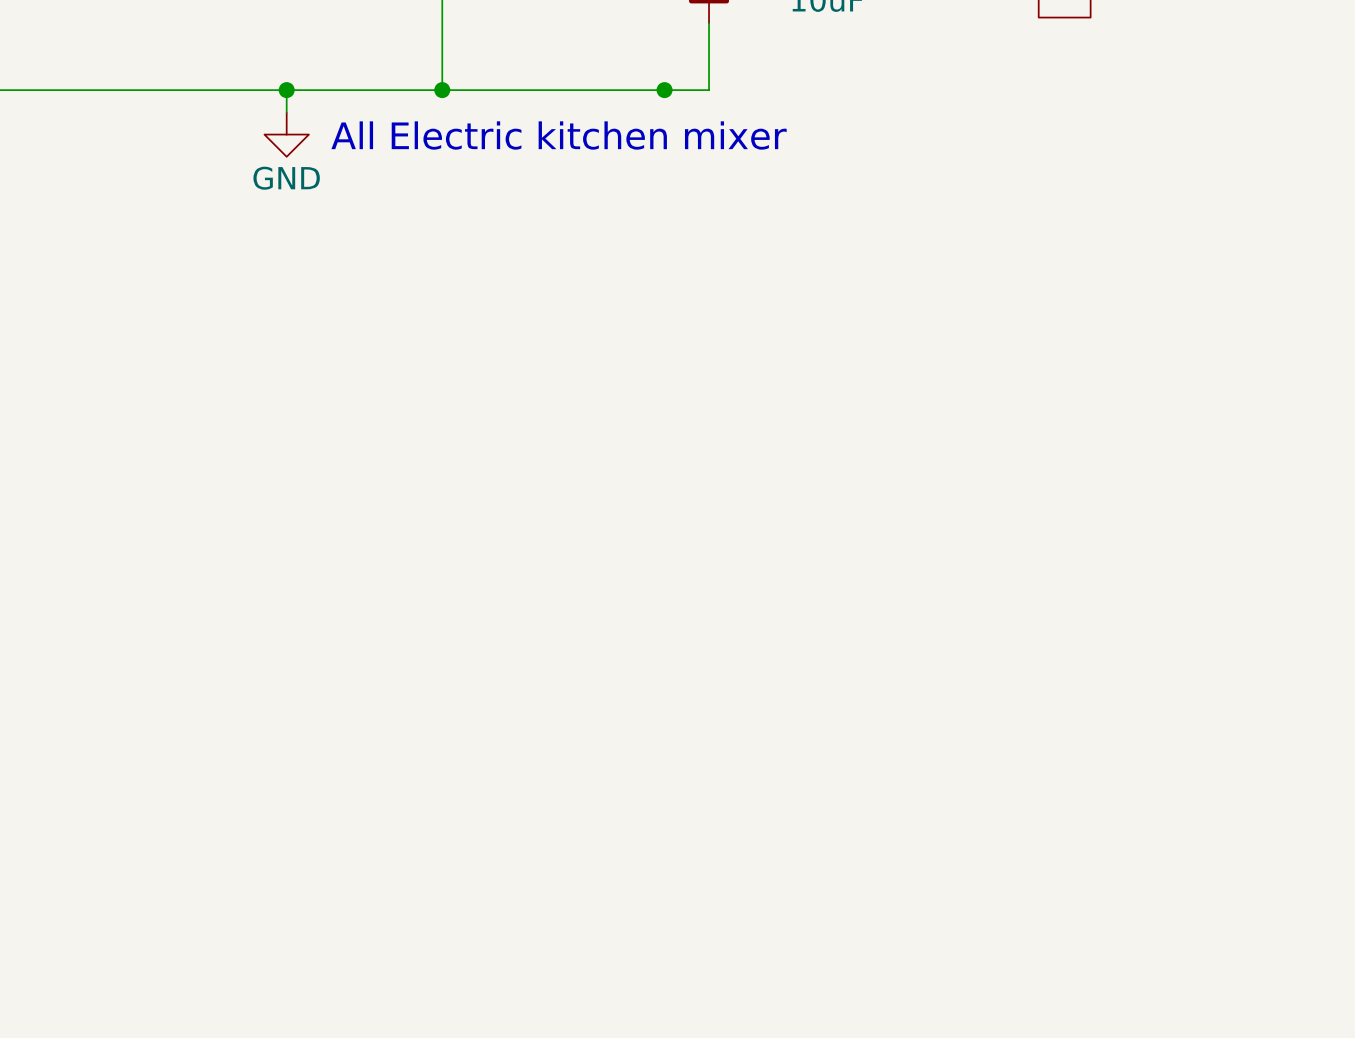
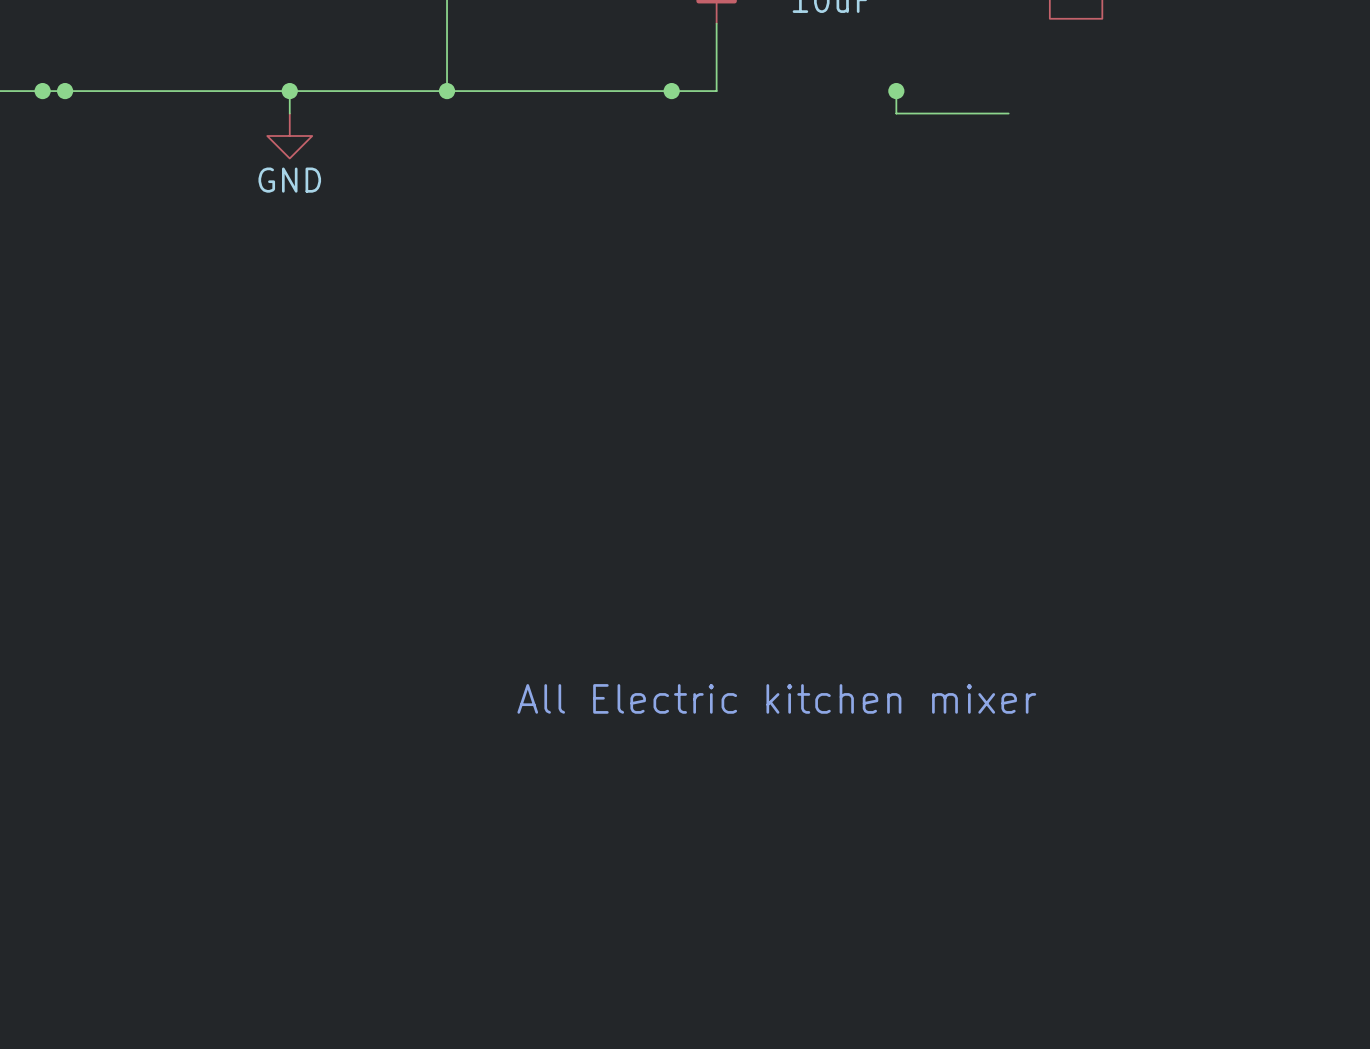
junction: none -> (42, 91)
junction: none -> (65, 91)
wire: none -> (896, 91) (896, 113) (1008, 113)
junction: none -> (896, 91)
text: All Electric kitchen mixer (559, 135) -> none
text: none -> All Electric kitchen mixer (776, 698)

